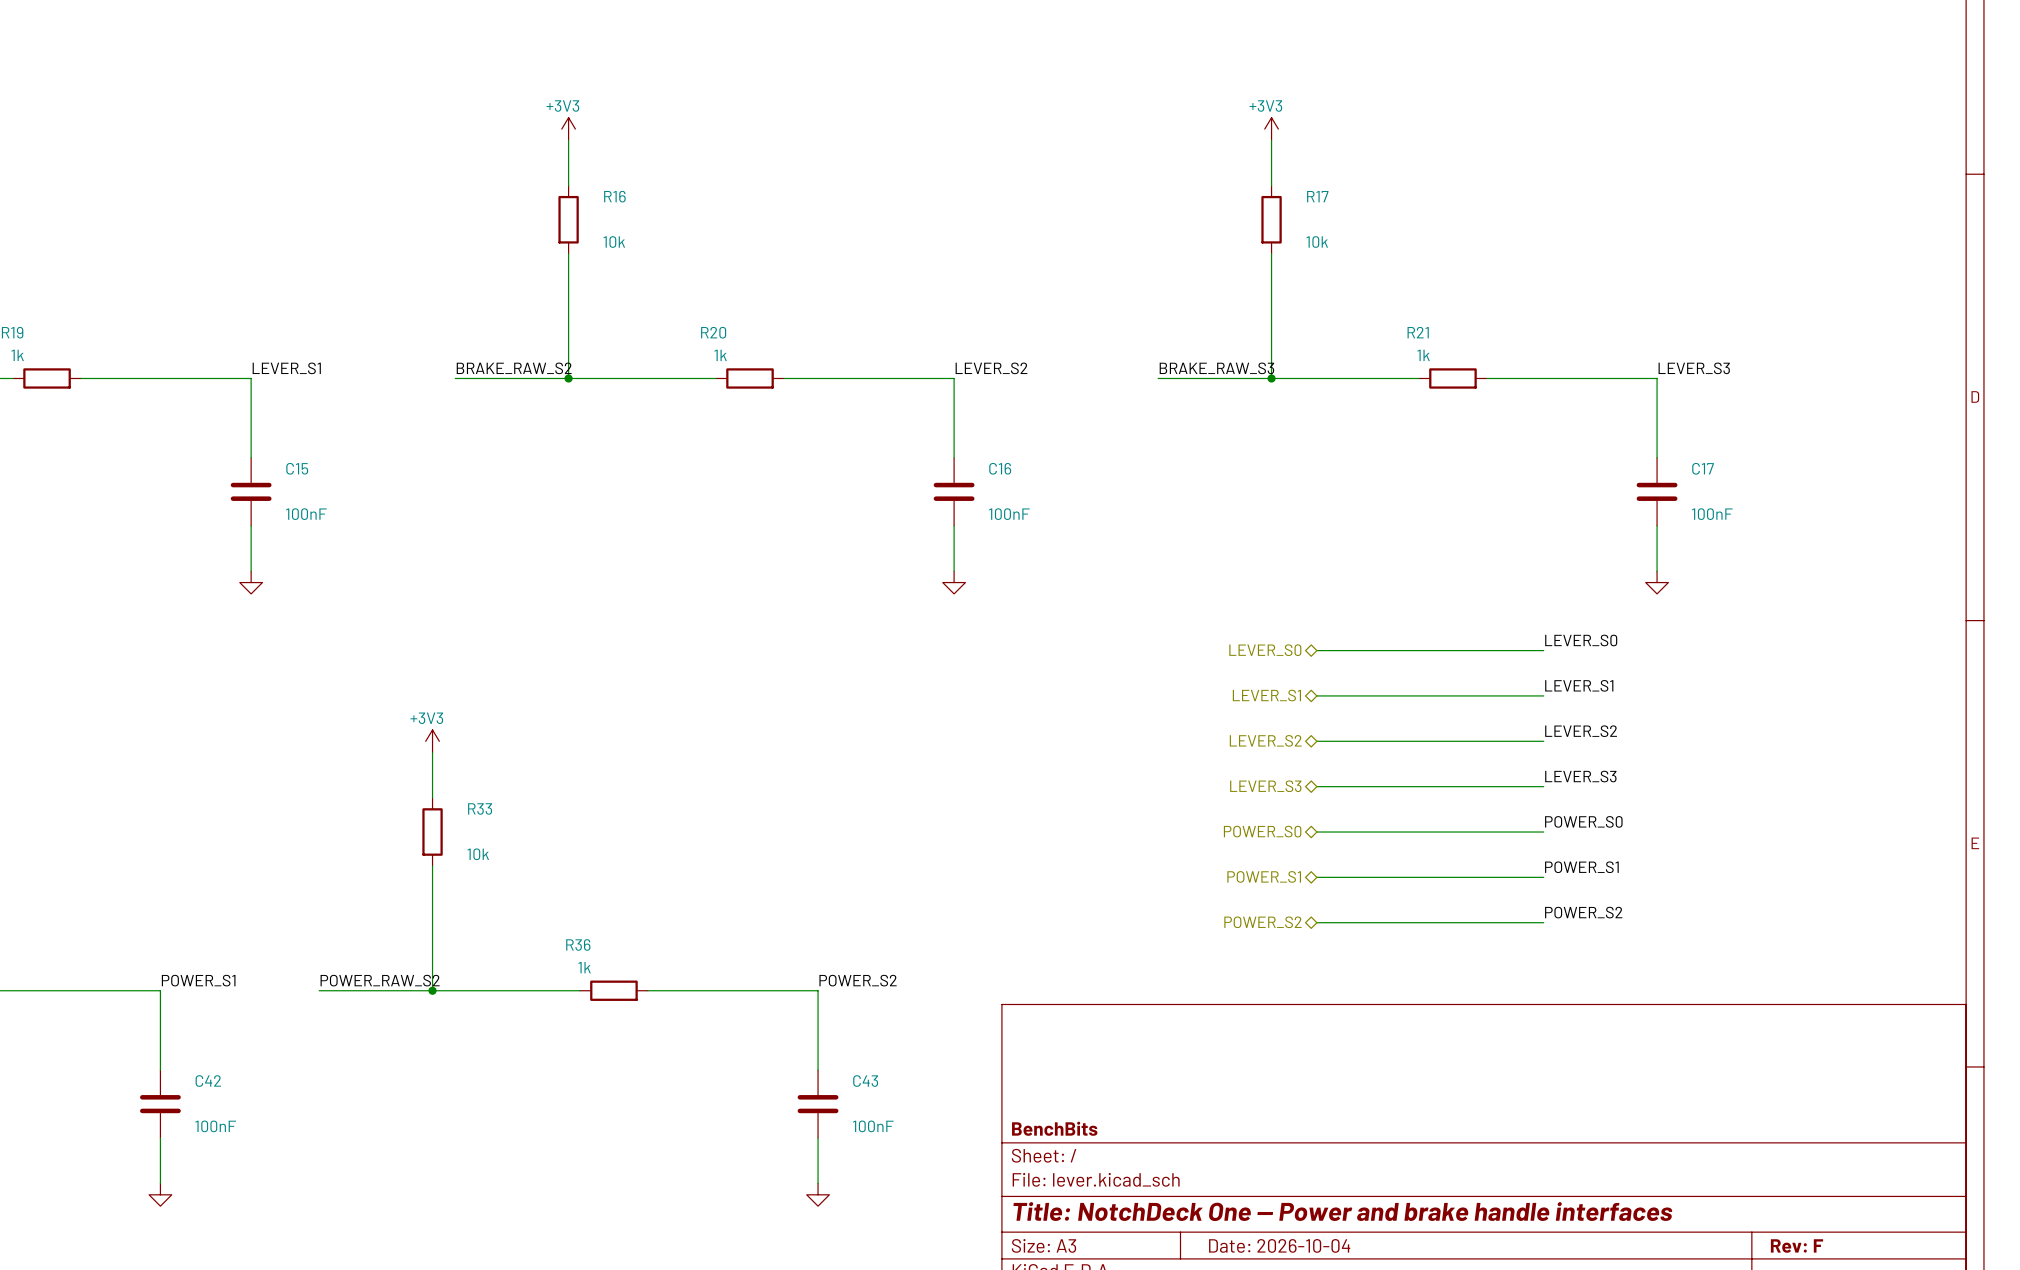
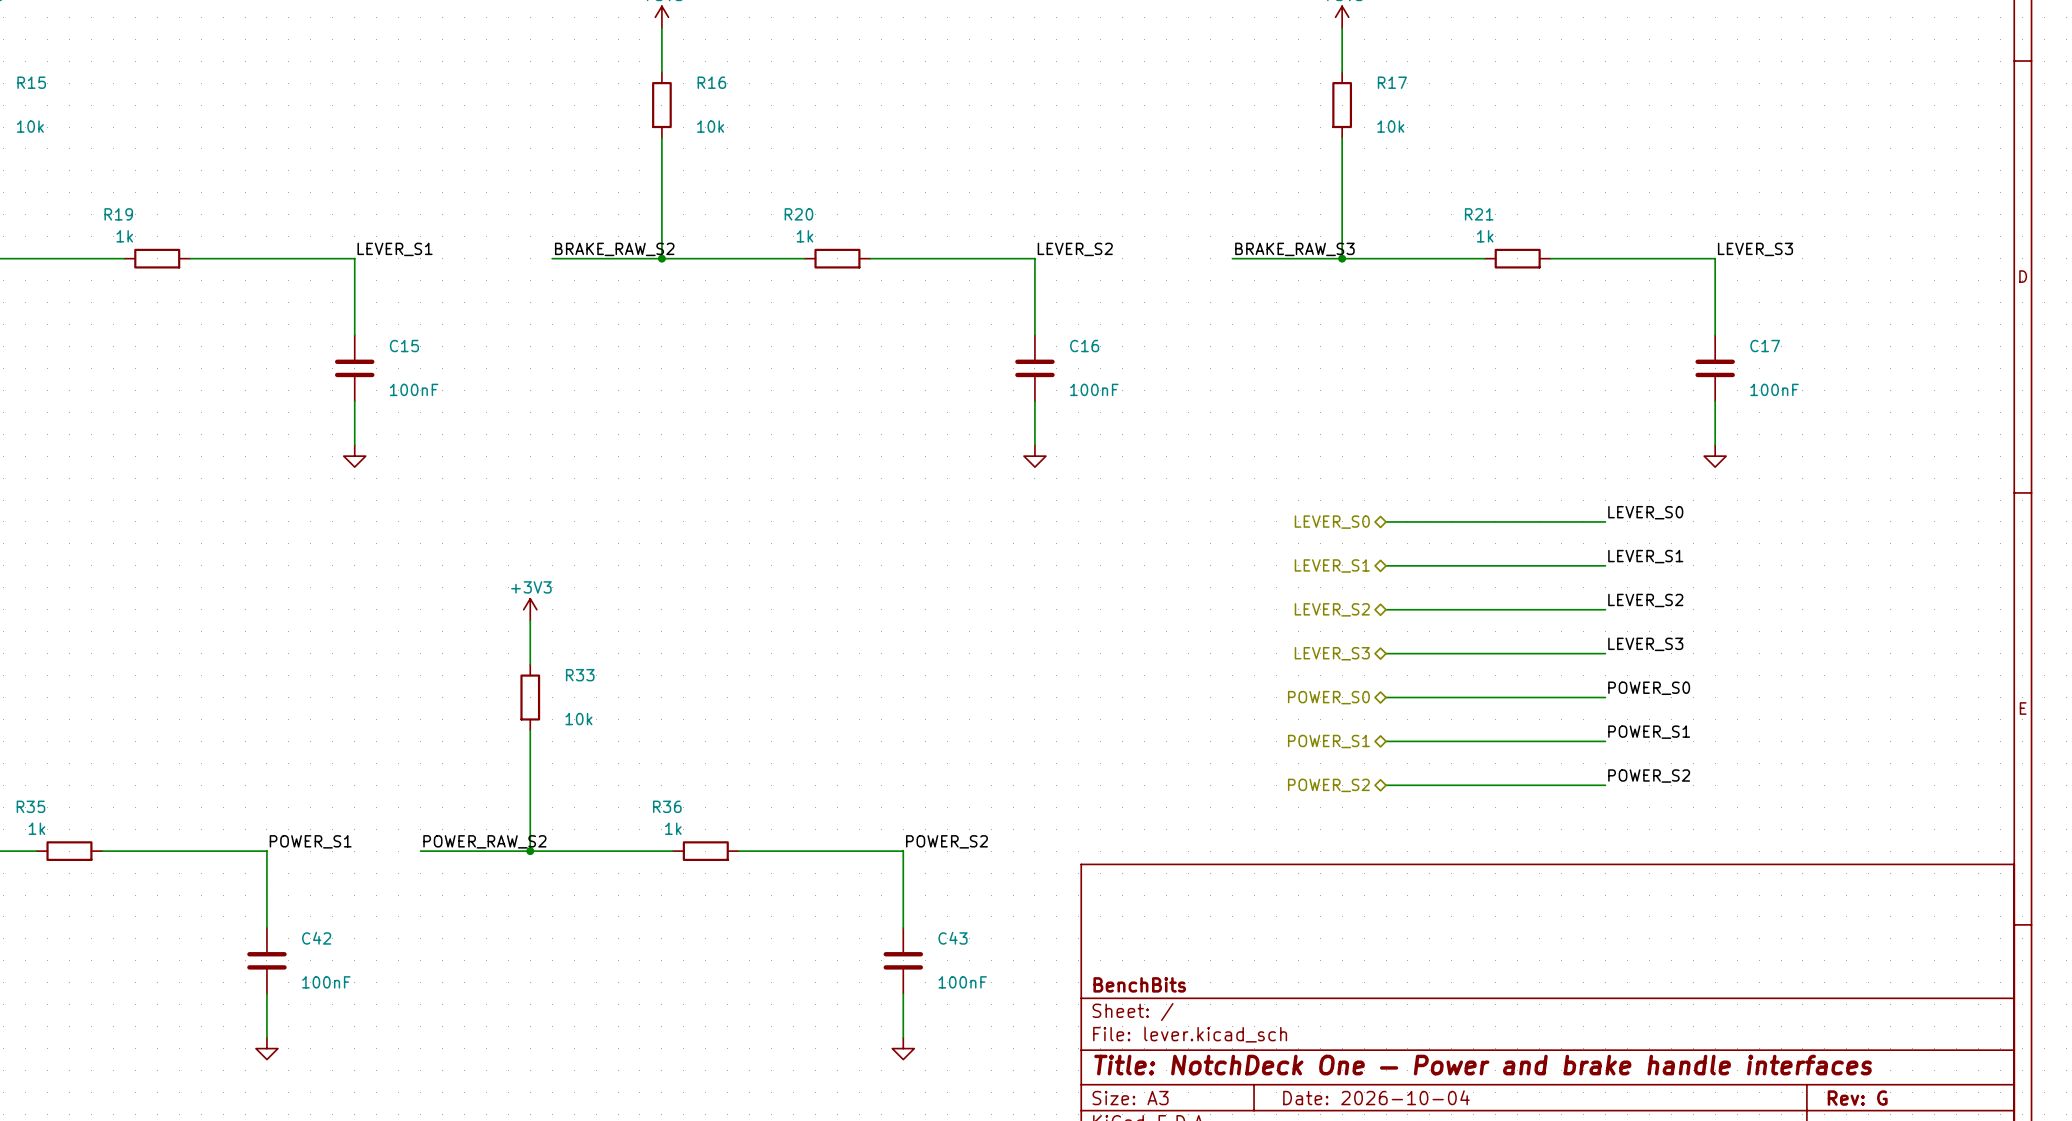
title block: Rev: F (1796, 1246) -> Rev: G (1857, 1098)

